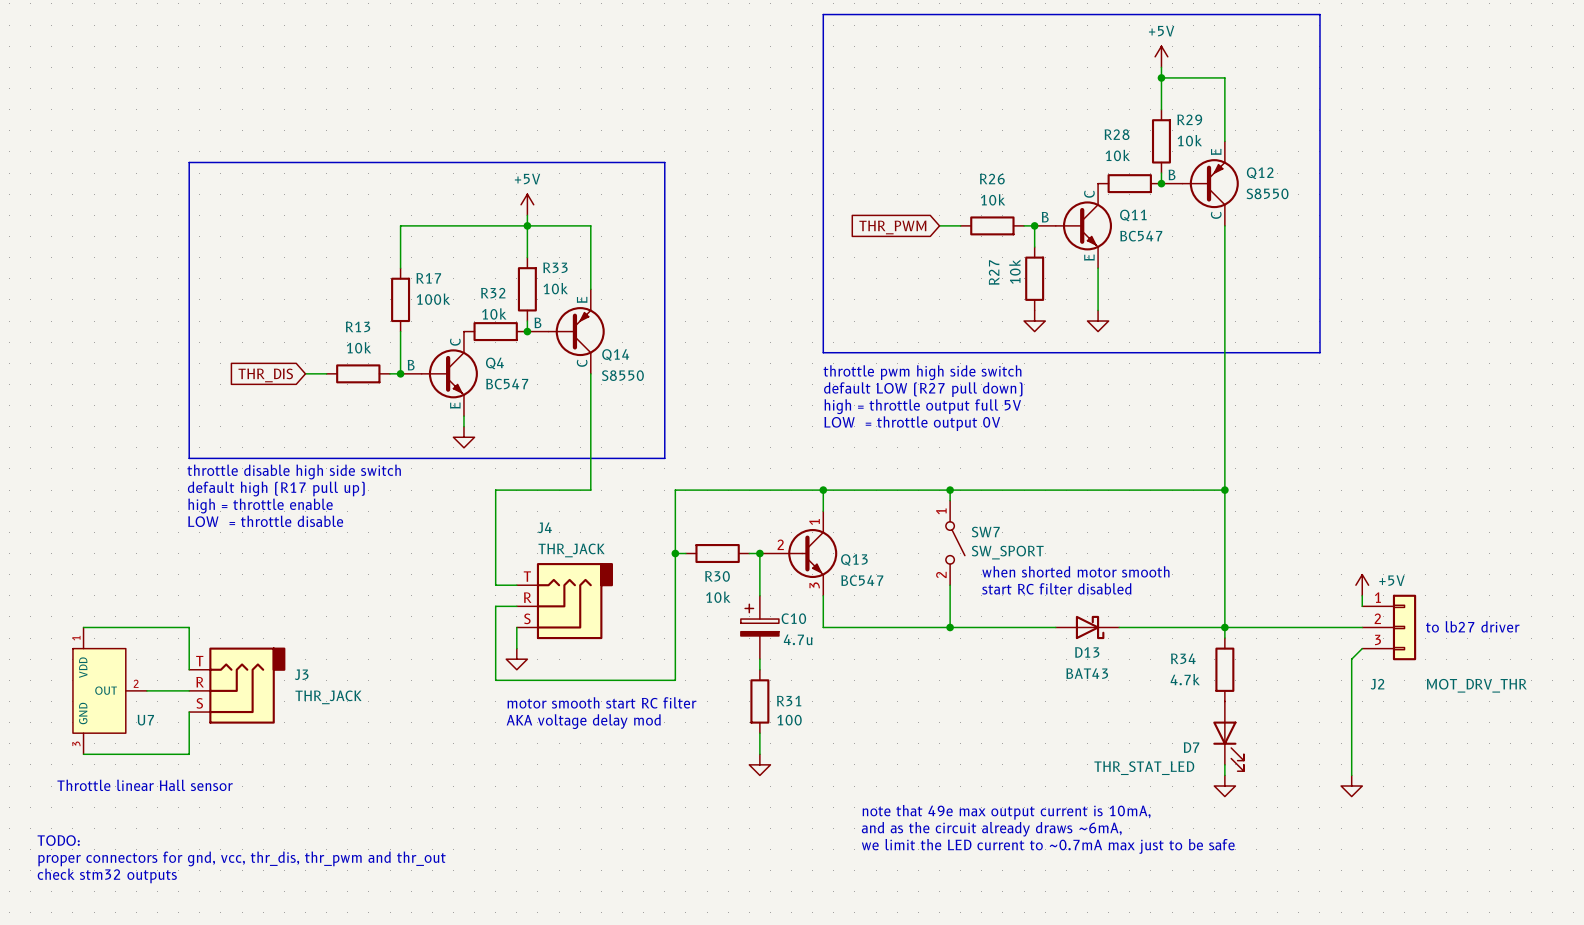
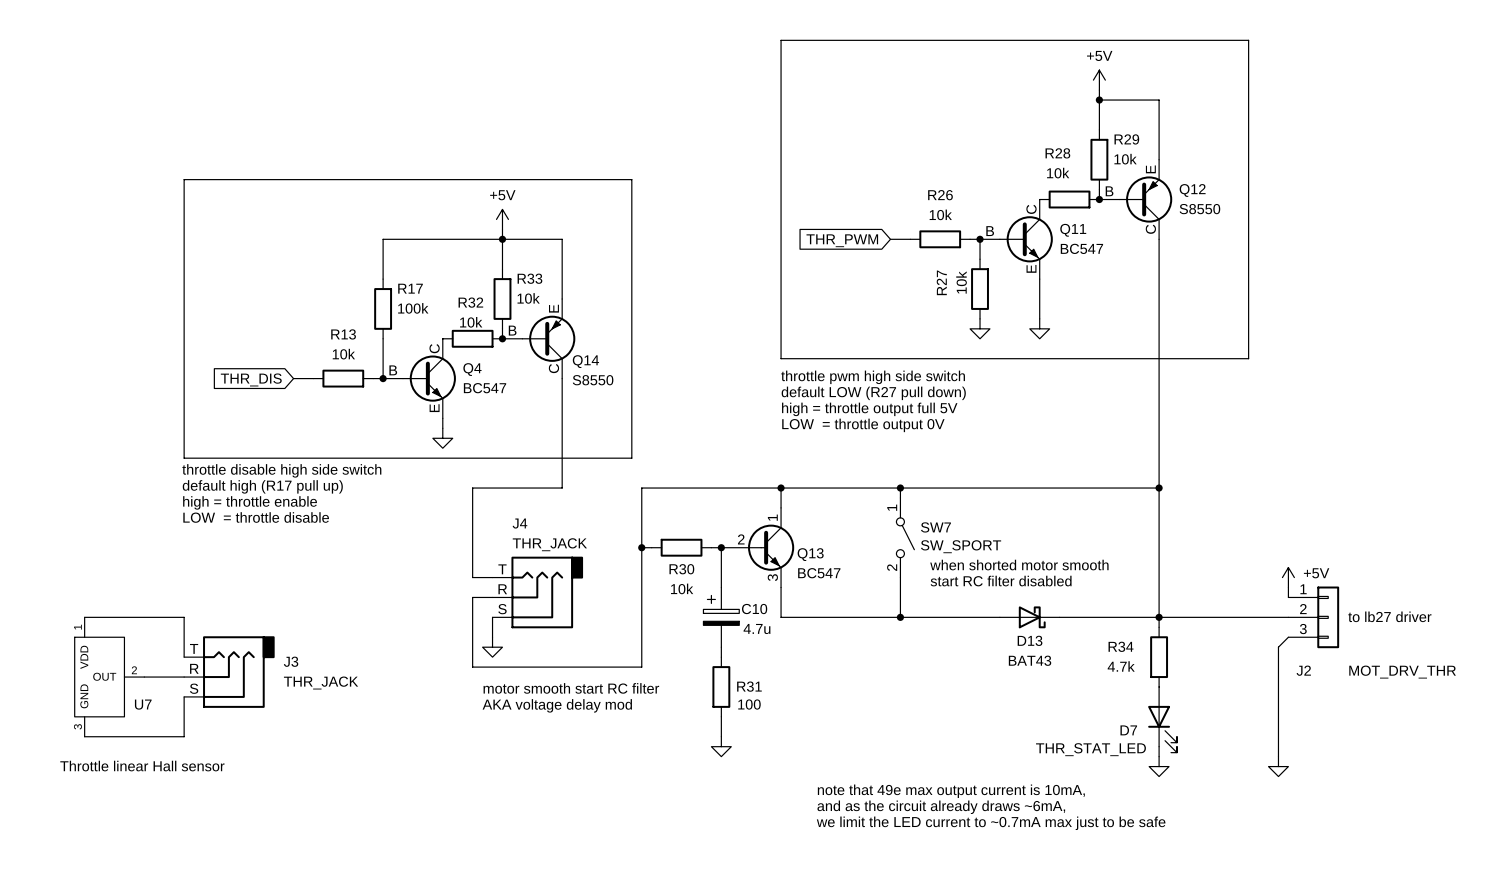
text: TODO: (58, 840) -> none
text: proper connectors for gnd, vcc, thr_dis, thr_pwm and thr_out (242, 858) -> none
text: check stm32 outputs (107, 875) -> none

